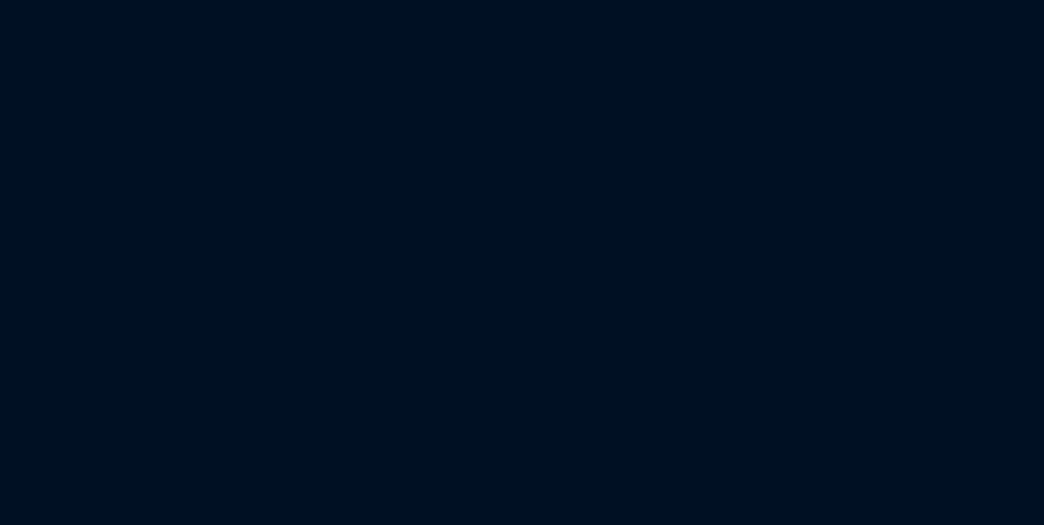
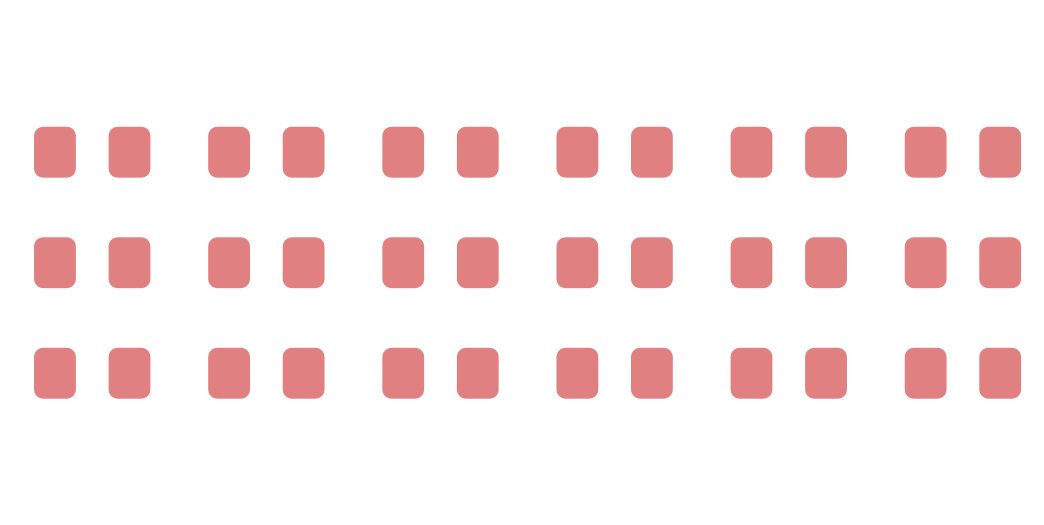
part: none -> (92, 152)
part: none -> (266, 152)
part: none -> (440, 152)
part: none -> (614, 152)
part: none -> (788, 152)
part: none -> (962, 152)
part: none -> (92, 262)
part: none -> (266, 262)
part: none -> (440, 262)
part: none -> (614, 262)
part: none -> (788, 262)
part: none -> (962, 262)
part: none -> (92, 373)
part: none -> (266, 373)
part: none -> (440, 373)
part: none -> (614, 373)
part: none -> (788, 373)
part: none -> (962, 373)

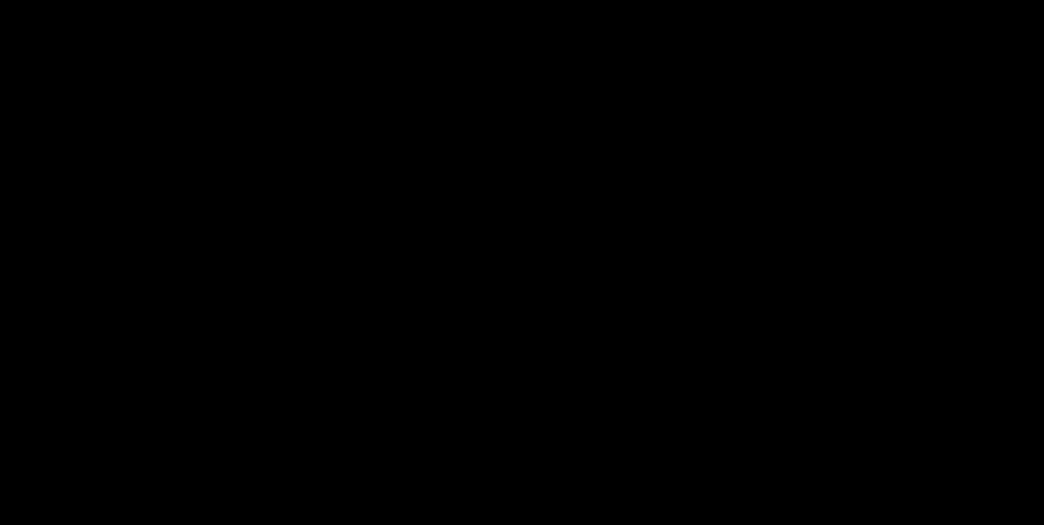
part: (92, 152) -> none
part: (266, 152) -> none
part: (440, 152) -> none
part: (614, 152) -> none
part: (788, 152) -> none
part: (962, 152) -> none
part: (92, 262) -> none
part: (266, 262) -> none
part: (440, 262) -> none
part: (614, 262) -> none
part: (788, 262) -> none
part: (962, 262) -> none
part: (92, 373) -> none
part: (266, 373) -> none
part: (440, 373) -> none
part: (614, 373) -> none
part: (788, 373) -> none
part: (962, 373) -> none

